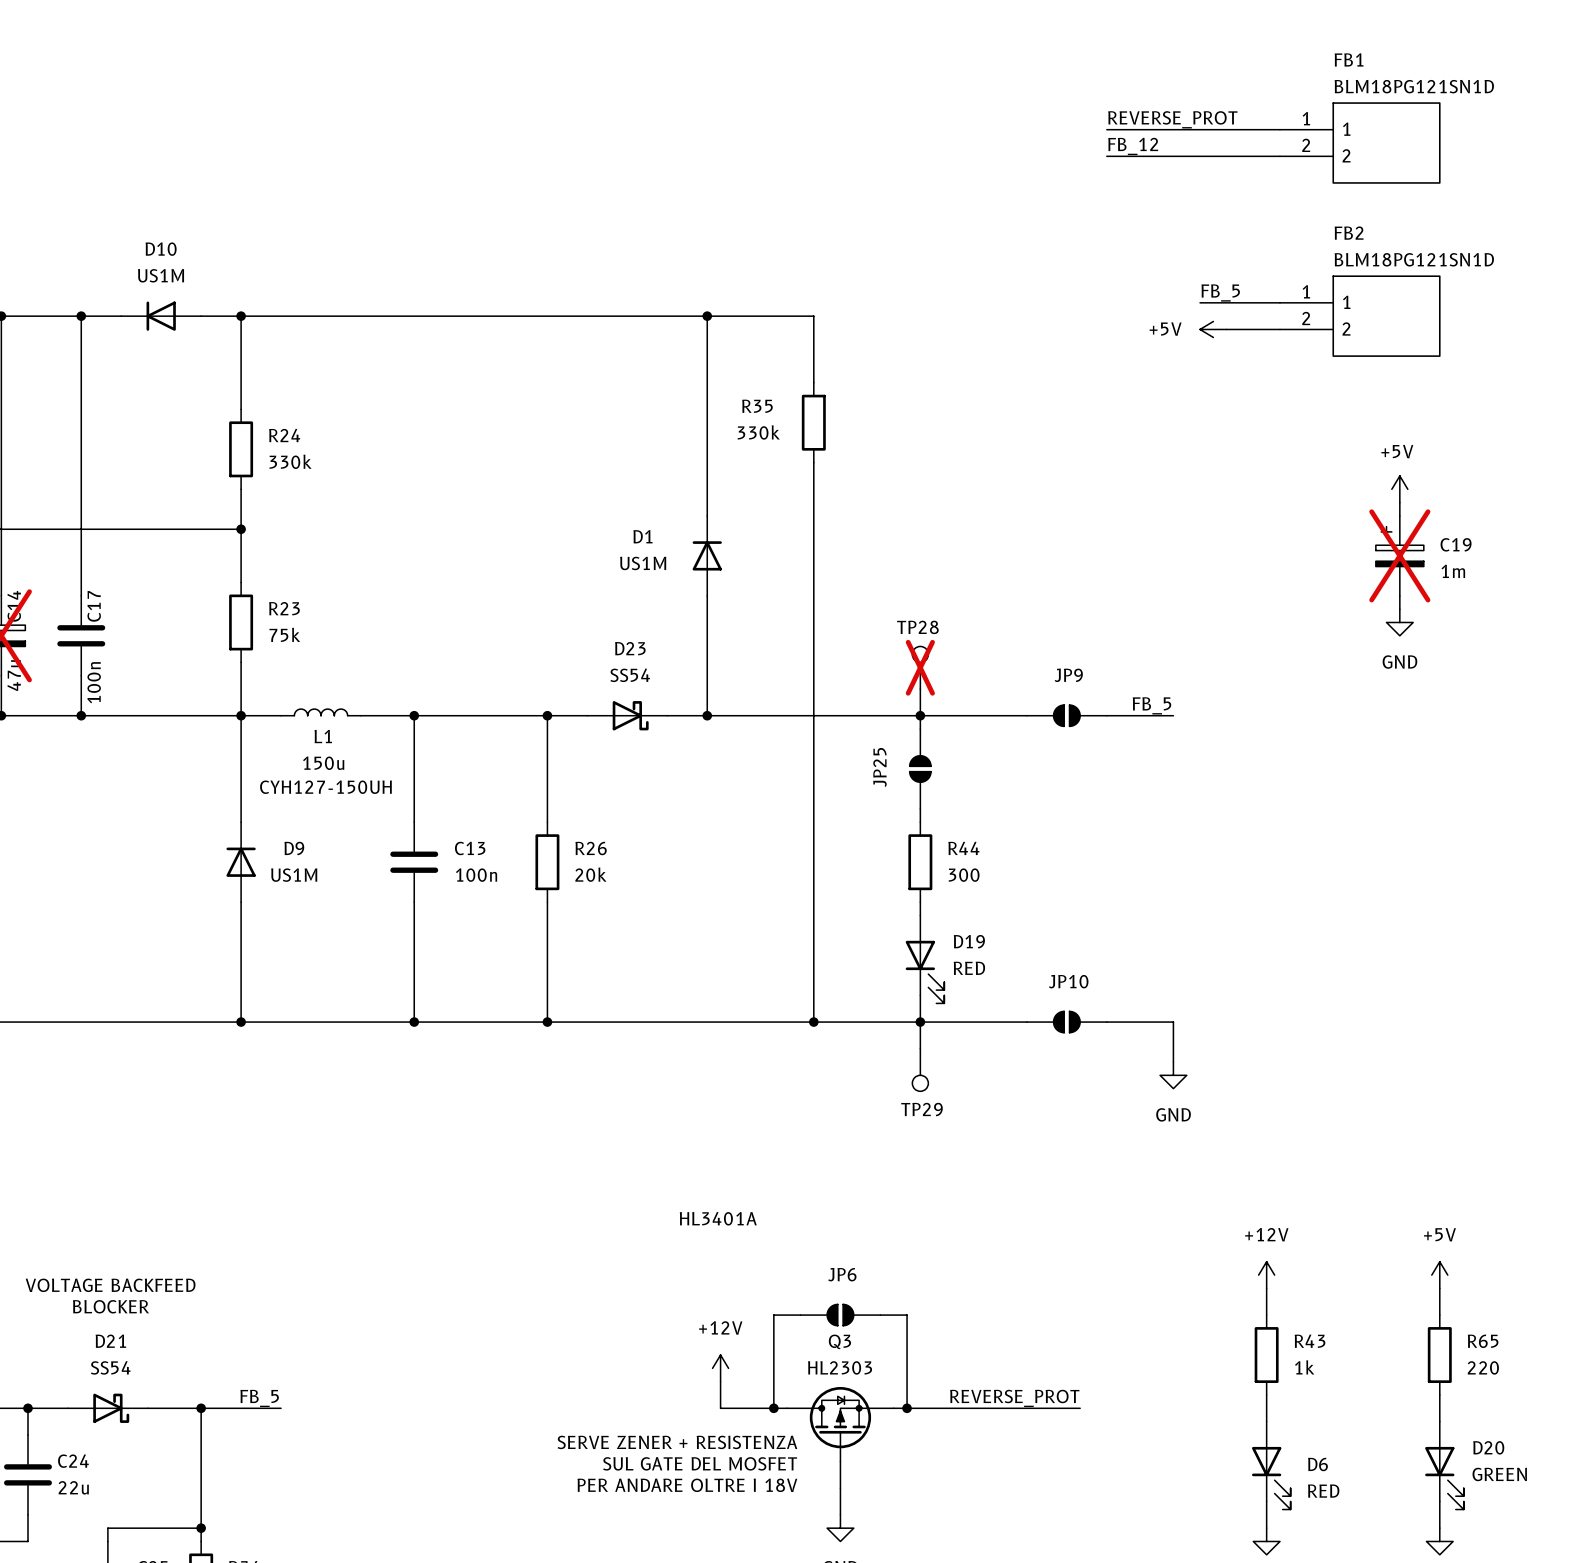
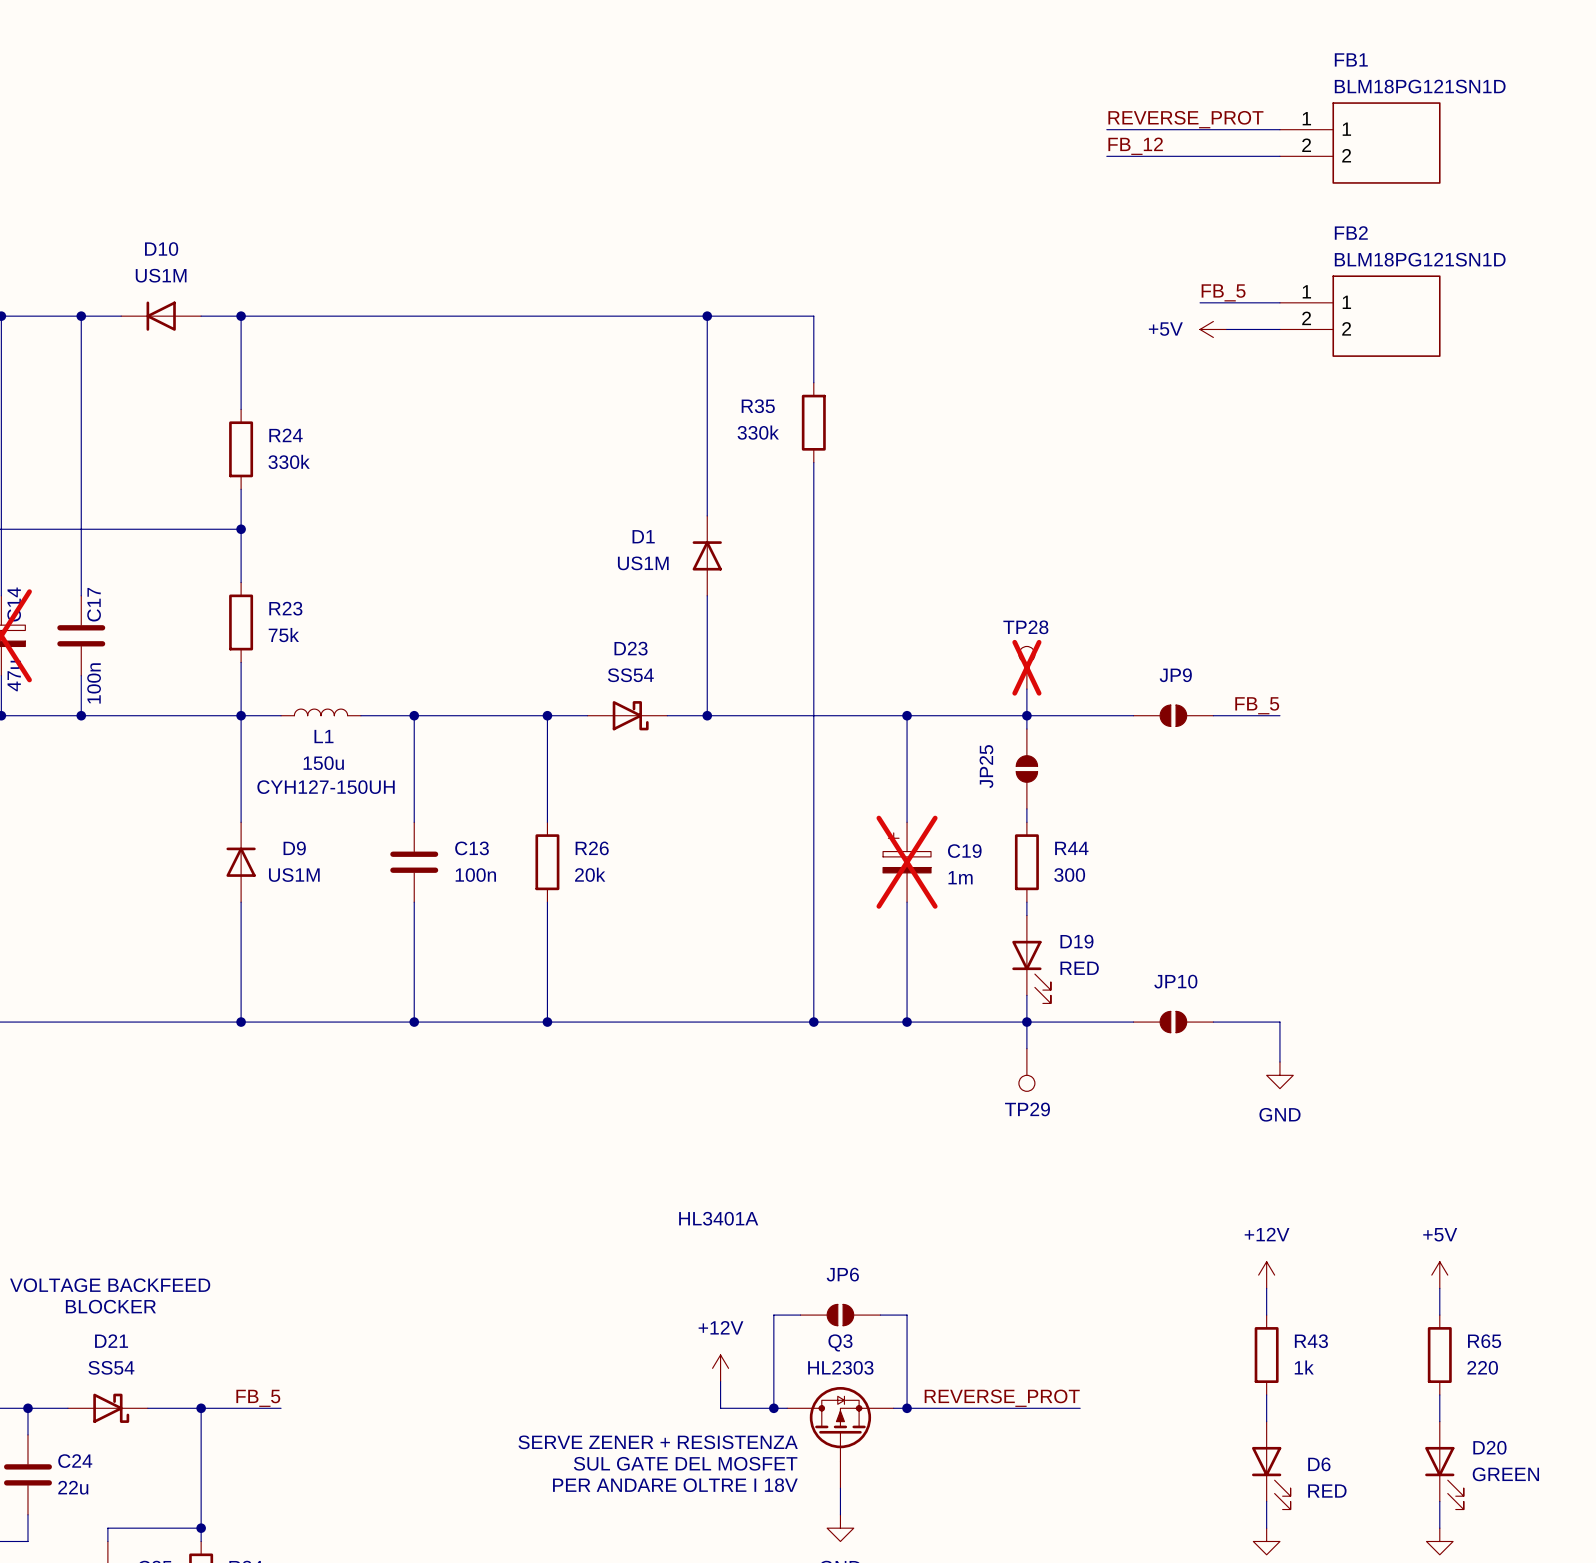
power symbol: +5V (1399, 489) -> none
wire: (1399, 502) (1399, 515) -> none
C19 position: (1399, 555) -> (907, 862)
wire: (1399, 595) (1399, 609) -> none
power symbol: GND (1399, 622) -> none
TP28 position: (920, 667) -> (1026, 667)
wire: (920, 689) (920, 729) -> (1026, 689) (1026, 729)
label position: FB_5 (1151, 705) -> FB_5 (1257, 705)
wire: none -> (907, 715) (907, 822)
junction position: (920, 715) -> (907, 715)
junction: none -> (1026, 715)
JP9 position: (1066, 715) -> (1173, 715)
wire: none -> (1213, 715) (1279, 715)
JP25 position: (920, 768) -> (1026, 768)
wire: (920, 808) (920, 822) -> (1026, 808) (1026, 822)
R44 position: (920, 862) -> (1026, 862)
wire: none -> (907, 902) (907, 1022)
wire: (920, 902) (920, 915) -> (1026, 902) (1026, 915)
D19 position: (925, 959) -> (1031, 959)
wire: (920, 995) (920, 1048) -> (1026, 995) (1026, 1048)
junction position: (920, 1022) -> (907, 1022)
junction: none -> (1026, 1022)
JP10 position: (1066, 1022) -> (1173, 1022)
wire: (1133, 1022) (1173, 1022) (1173, 1062) -> none
wire: none -> (1213, 1022) (1279, 1022) (1279, 1062)
TP29 position: (920, 1070) -> (1026, 1070)
power symbol position: GND (1173, 1075) -> GND (1279, 1075)

